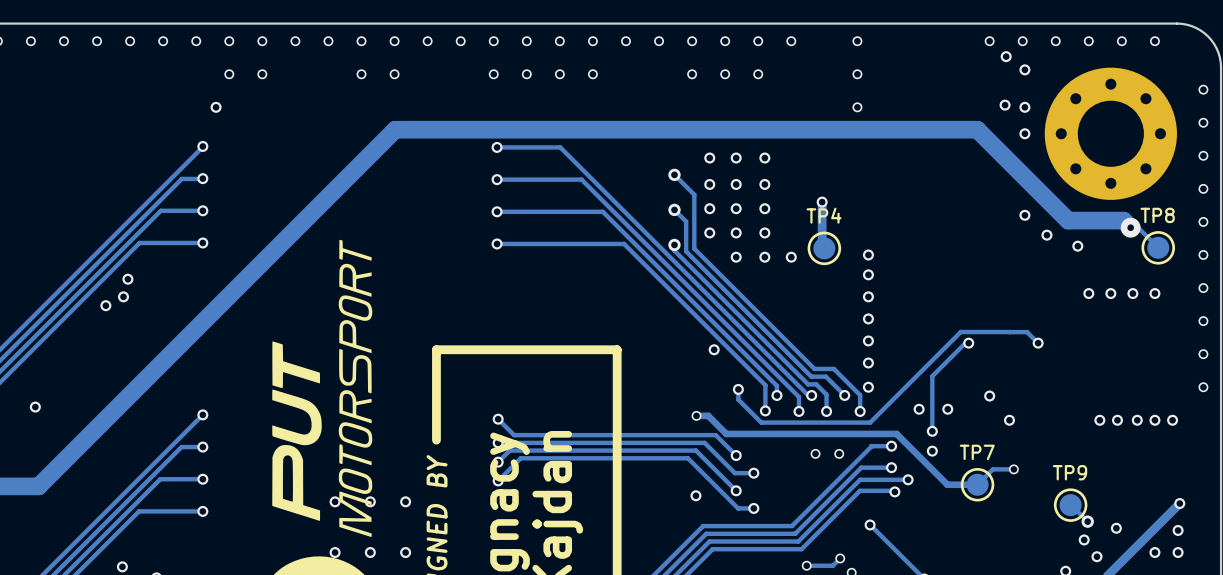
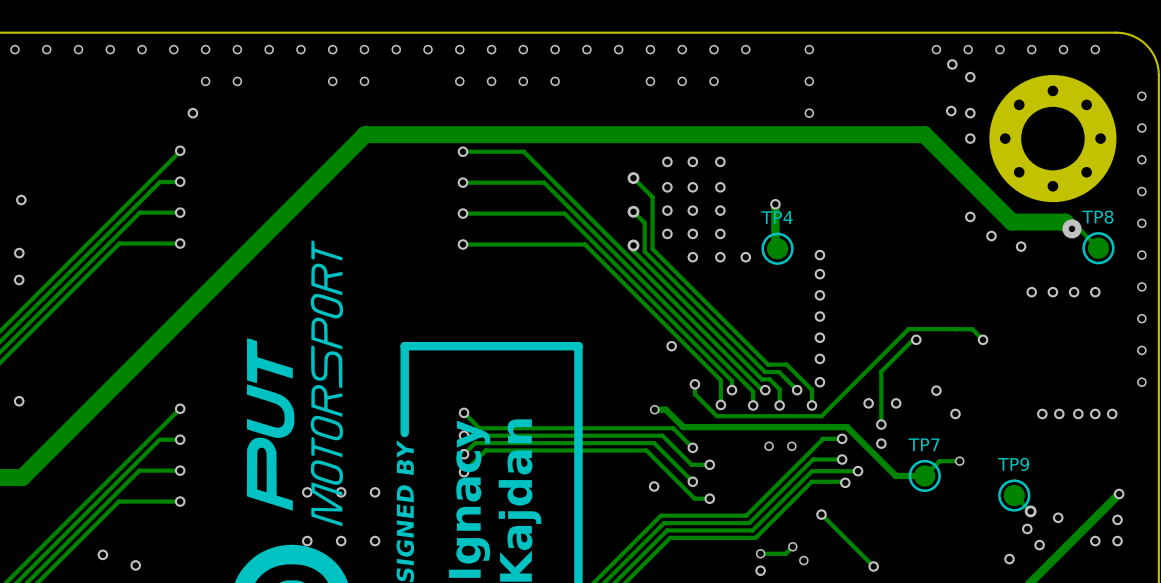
via: none -> (21, 200)
via: none -> (19, 253)
via: (127, 279) -> none
via: none -> (19, 279)
via: (123, 296) -> none
via: (105, 305) -> none

